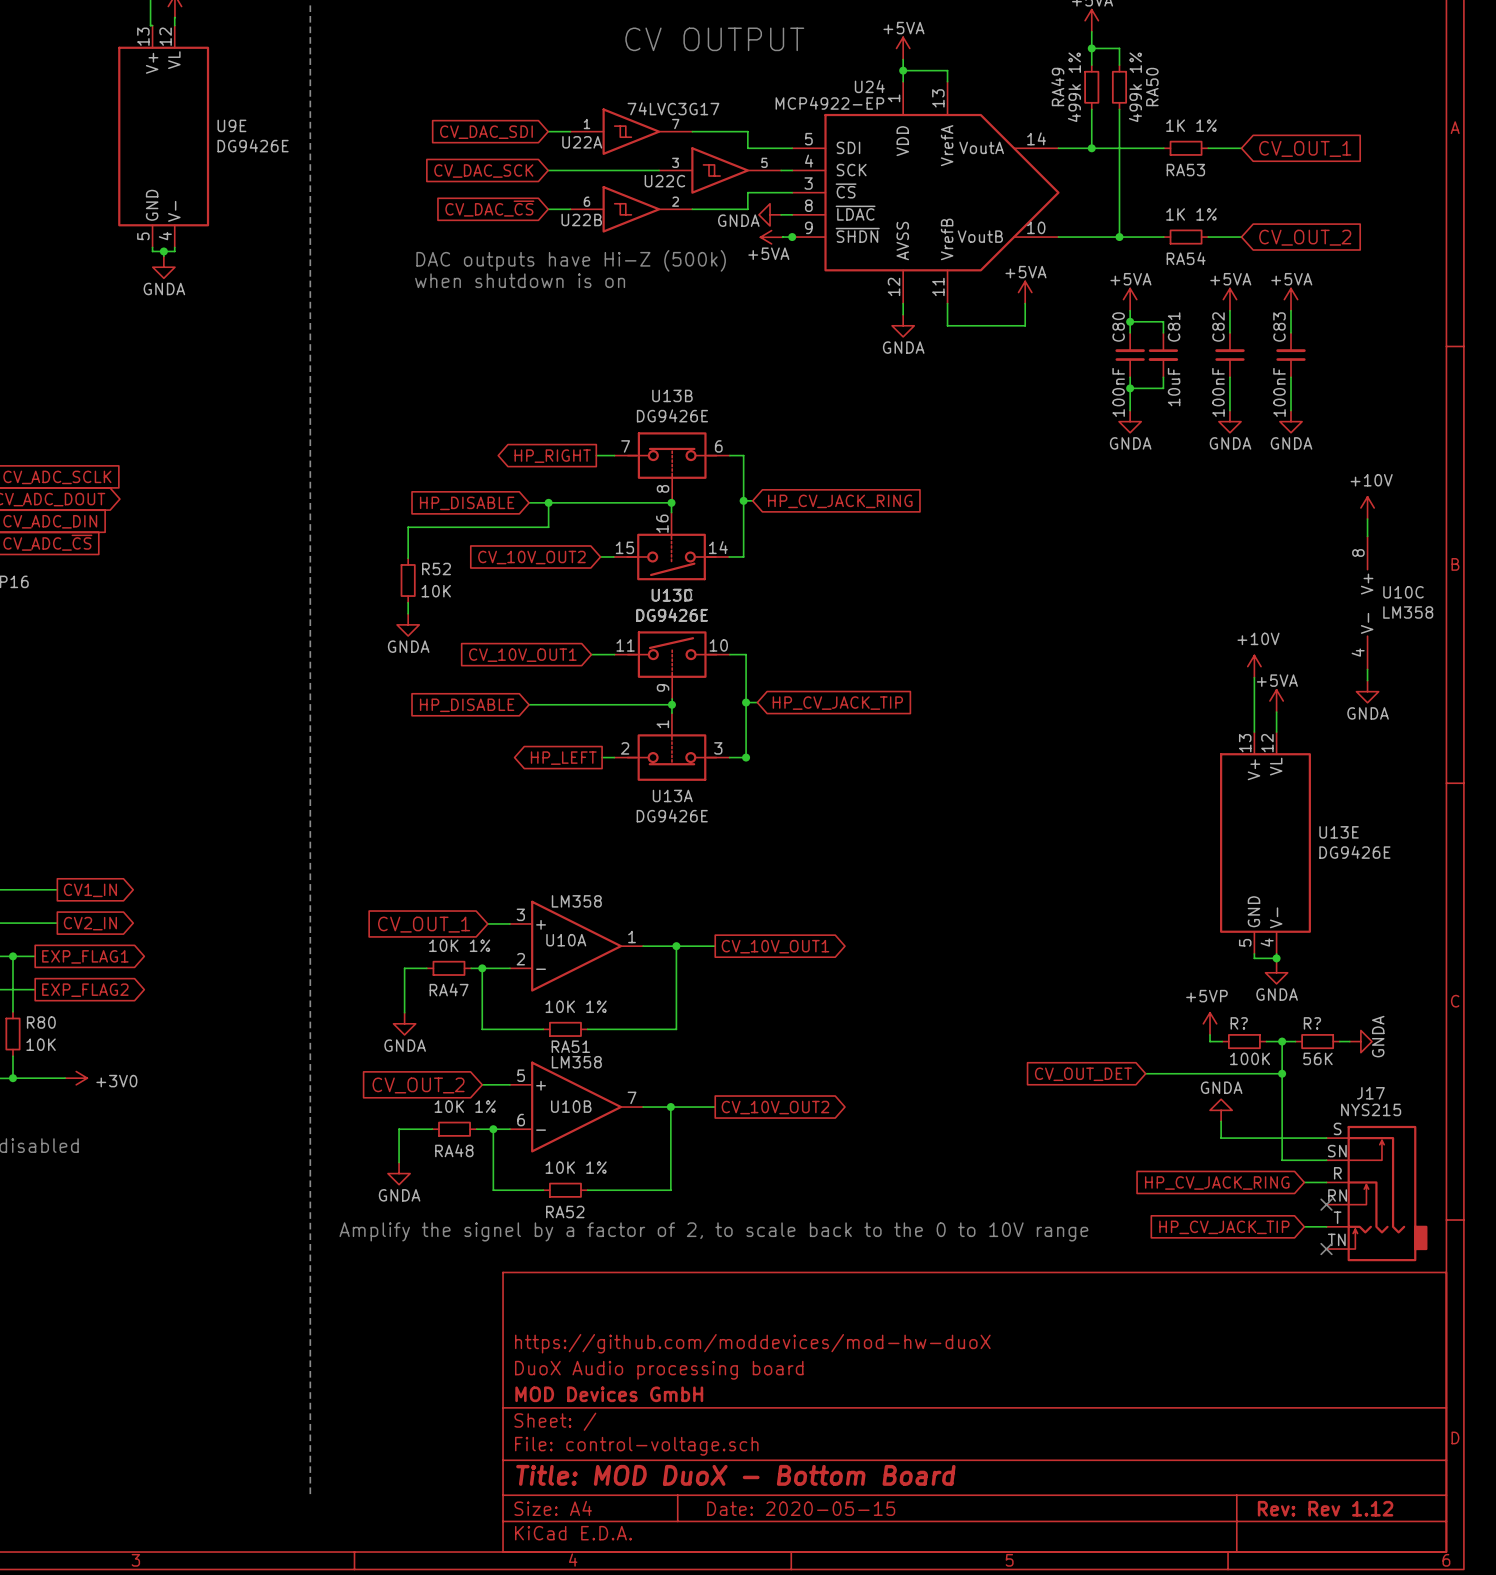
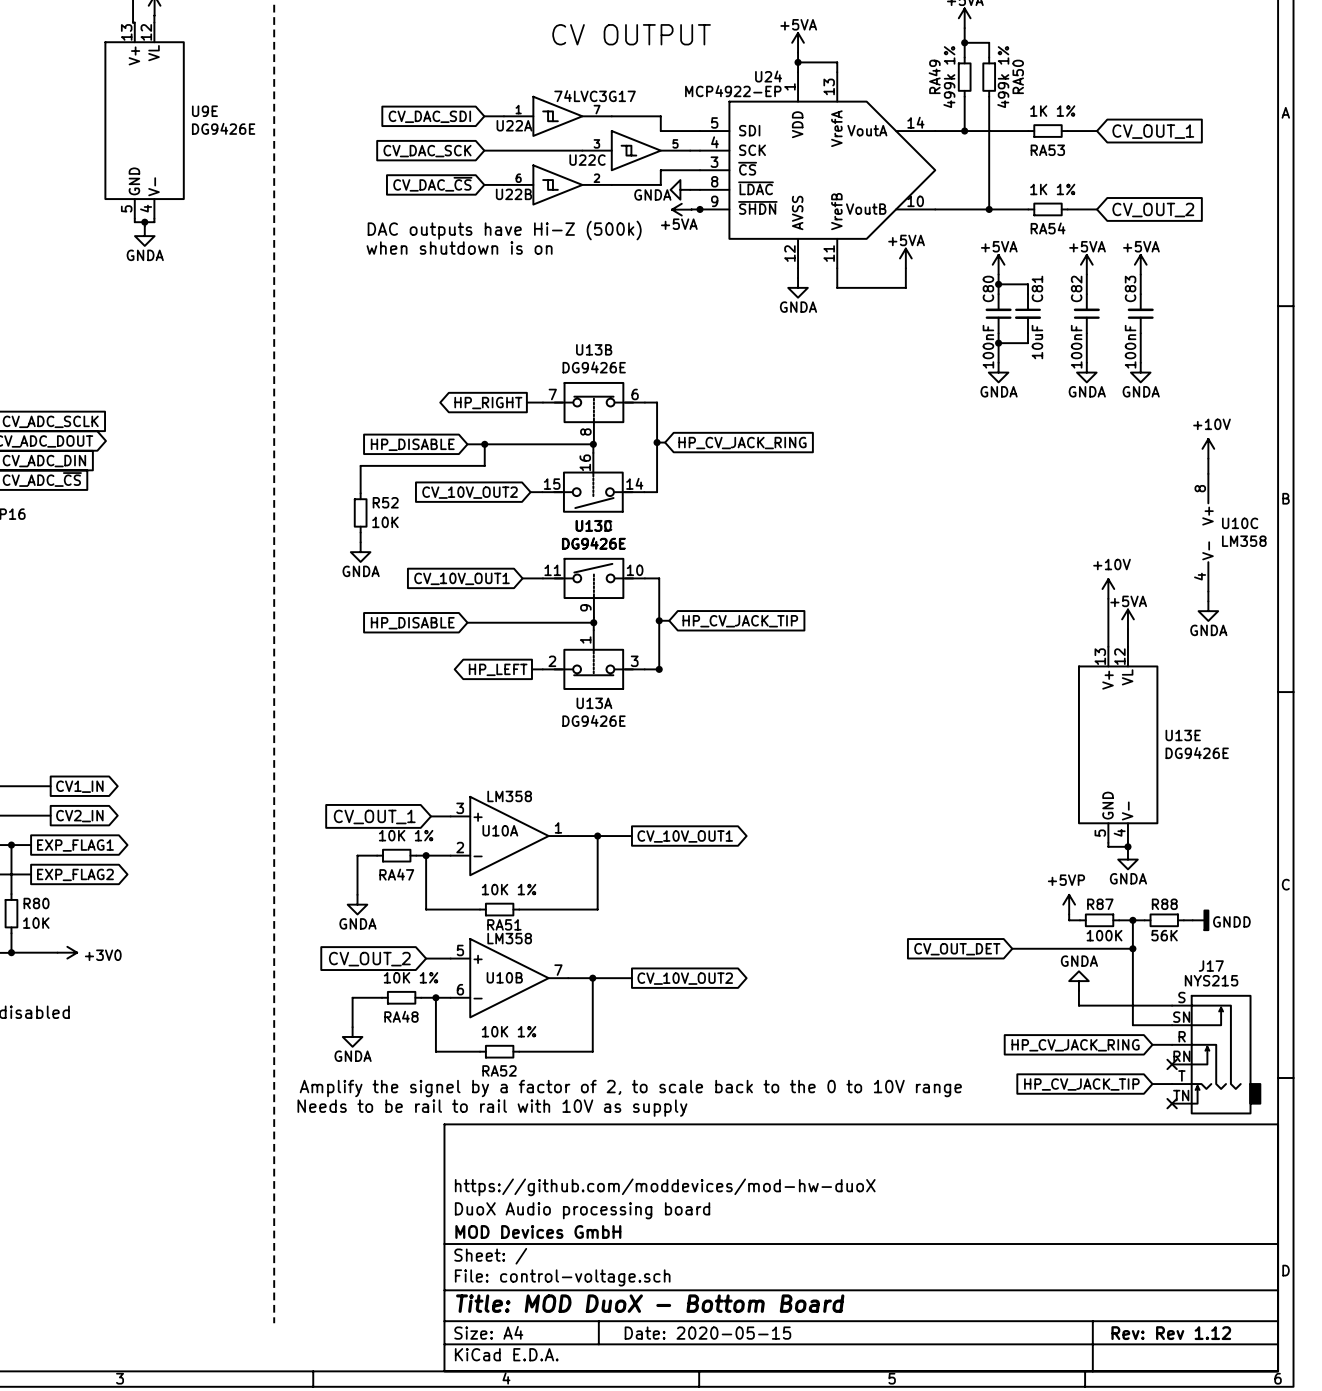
R? name: R? (1239, 1023) -> R87 (1100, 904)
R? name: R? (1312, 1023) -> R88 (1164, 904)
power symbol: GNDA (1360, 1041) -> GNDD (1201, 920)
text: none -> Needs to be rail to rail with 10V as supply (492, 1108)

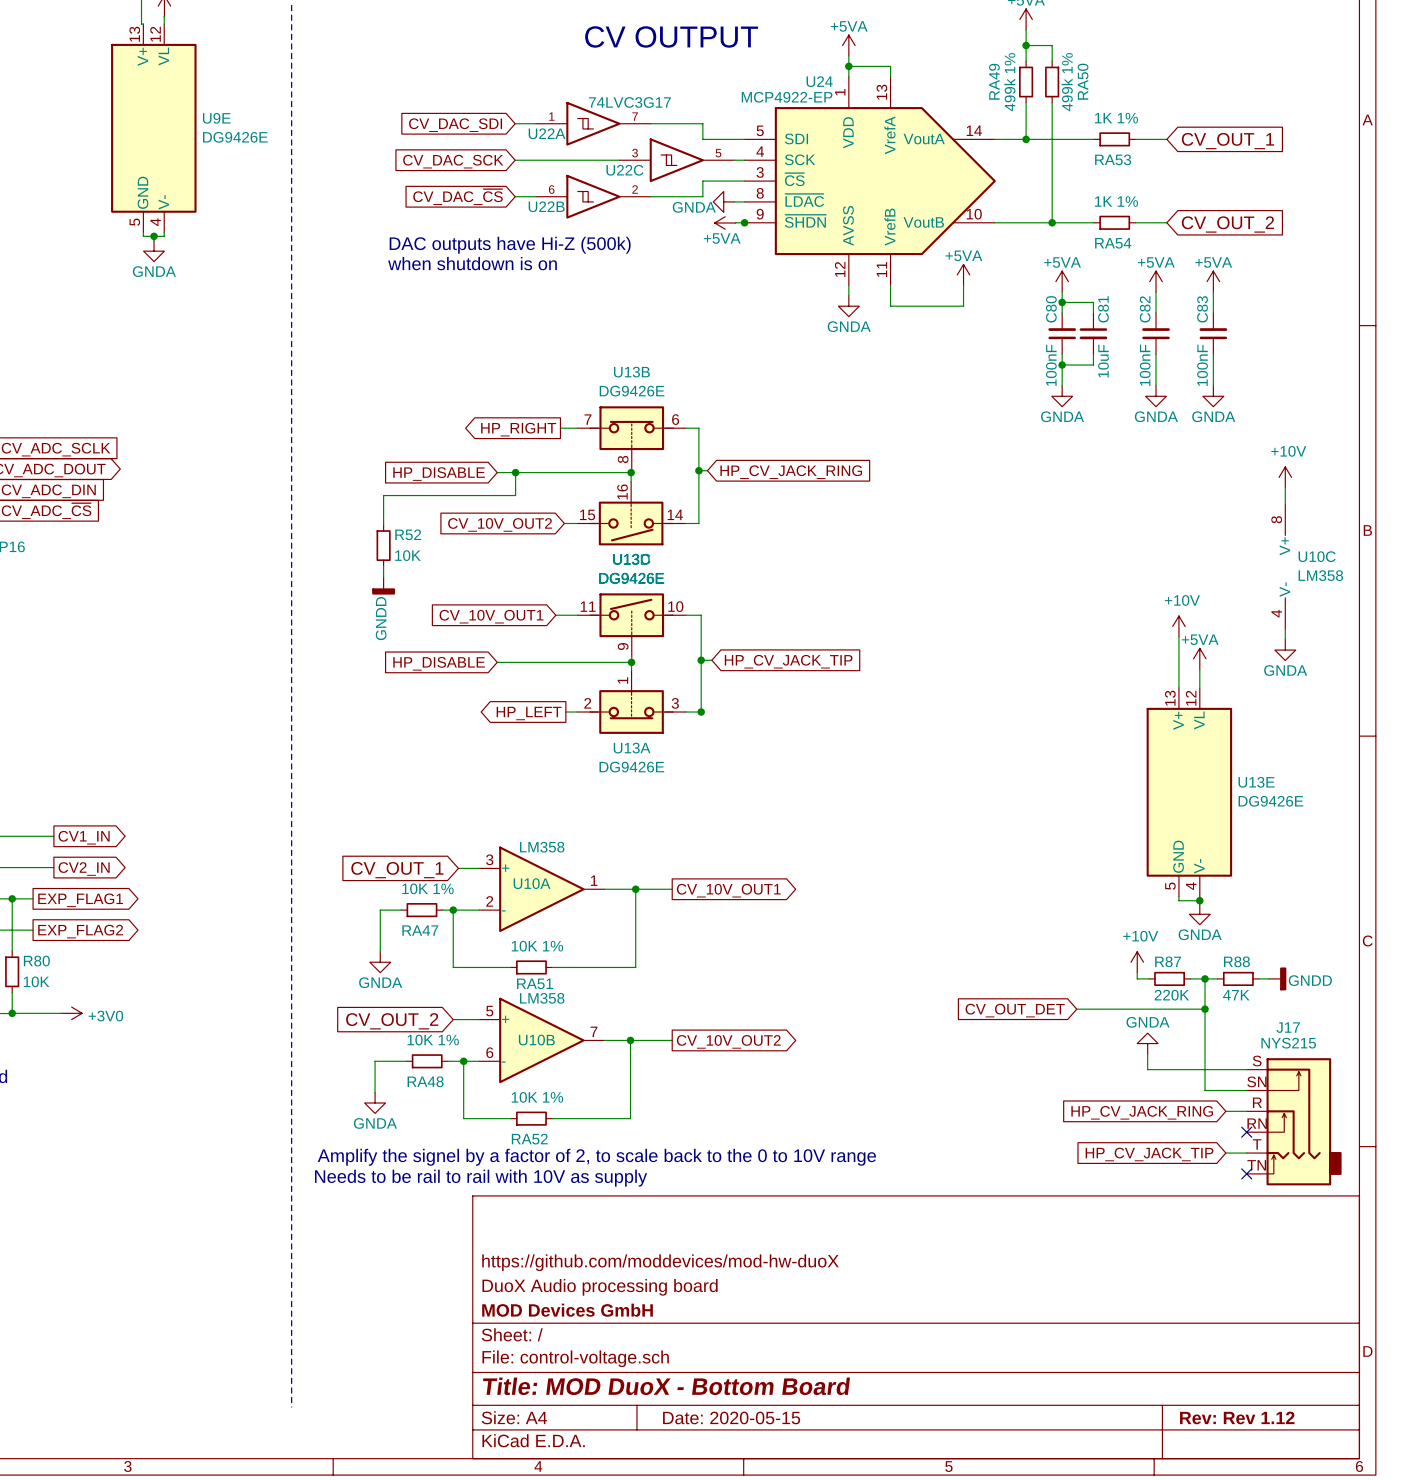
power symbol: GNDA (360, 552) -> GNDD (383, 585)
power symbol: +5VP (1069, 904) -> +10V (1137, 962)
R87 value: 100K (1104, 935) -> 220K (1171, 995)
R88 value: 56K (1164, 935) -> 47K (1236, 995)

